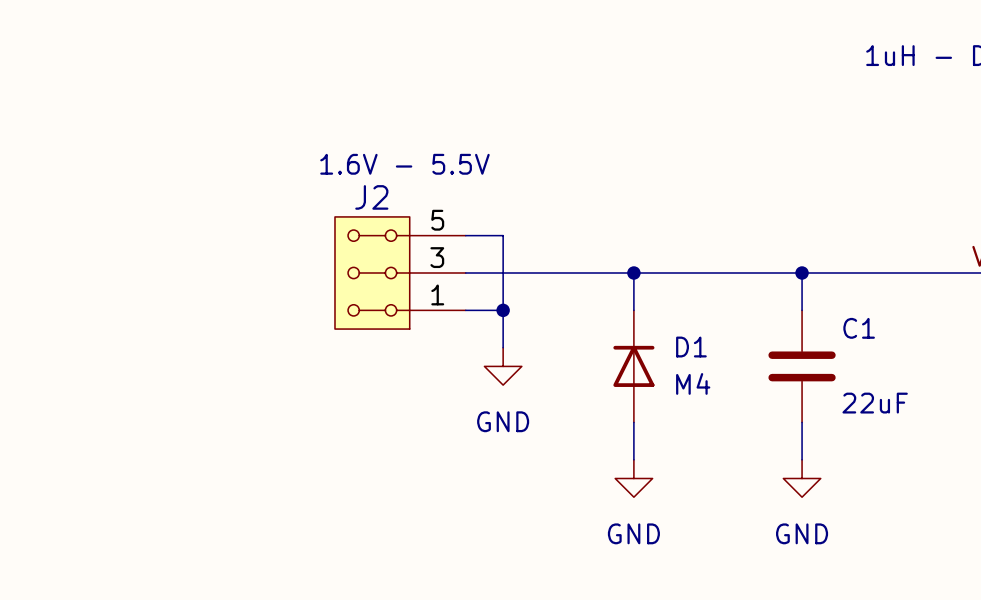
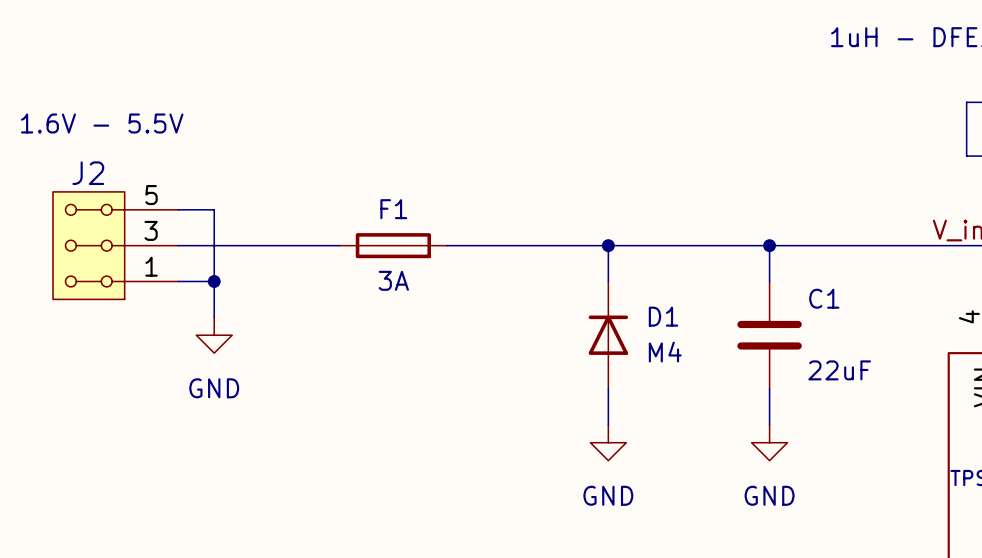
text position: 1.6V - 5.5V (404, 164) -> 1.6V - 5.5V (102, 123)
wire: (465, 235) (503, 235) (503, 347) -> (178, 209) (214, 209) (214, 317)
wire: none -> (178, 245) (339, 245)
J2 position: (400, 273) -> (115, 245)
F1: none -> 3A (393, 245)
junction: none -> (214, 281)
wire: (465, 310) (503, 310) -> (178, 281) (214, 281)
junction: (503, 310) -> none
power symbol position: GND (503, 366) -> GND (214, 335)

